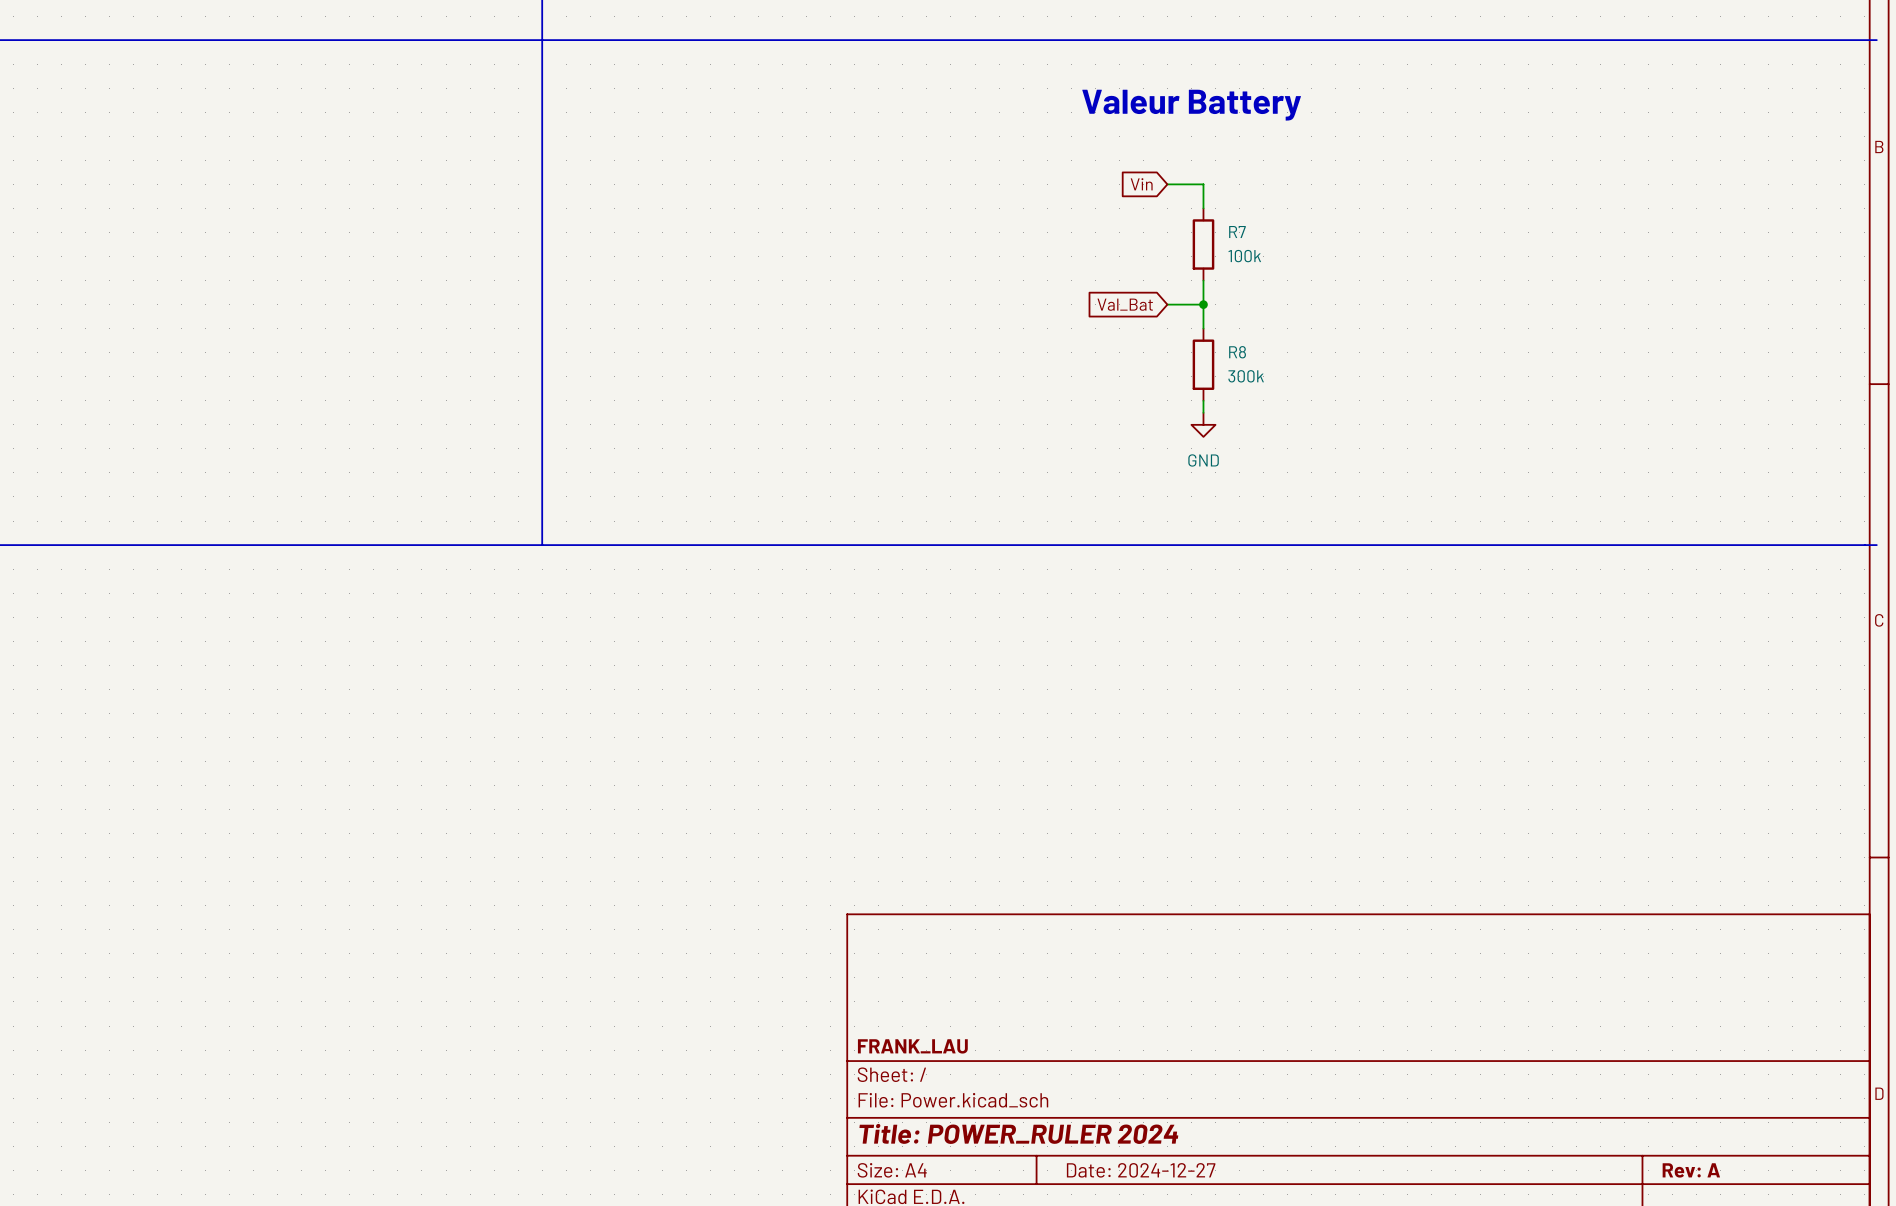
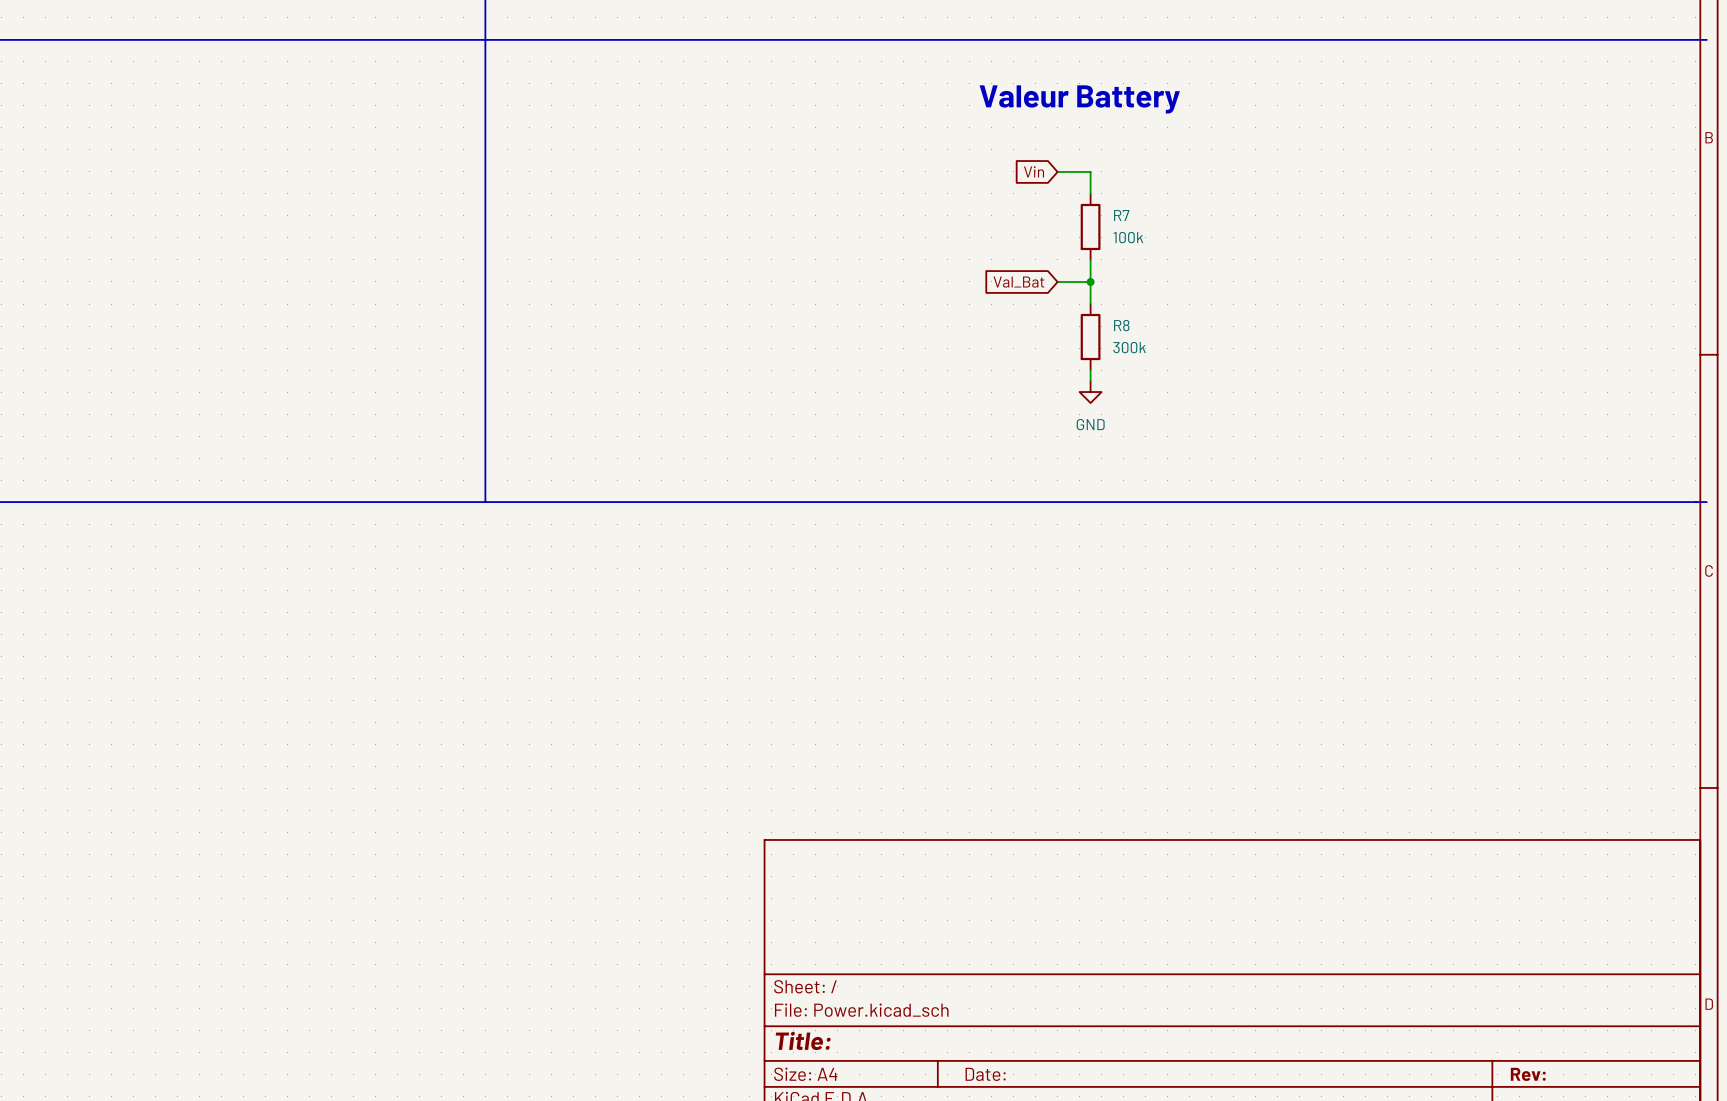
title block: FRANK_LAU (912, 1046) -> none
title block: Title: POWER_RULER 2024 (1018, 1133) -> Title: (803, 1040)
title block: Date: 2024-12-27 (1141, 1170) -> Date: (985, 1074)
title block: Rev: A (1691, 1170) -> Rev: (1528, 1074)

